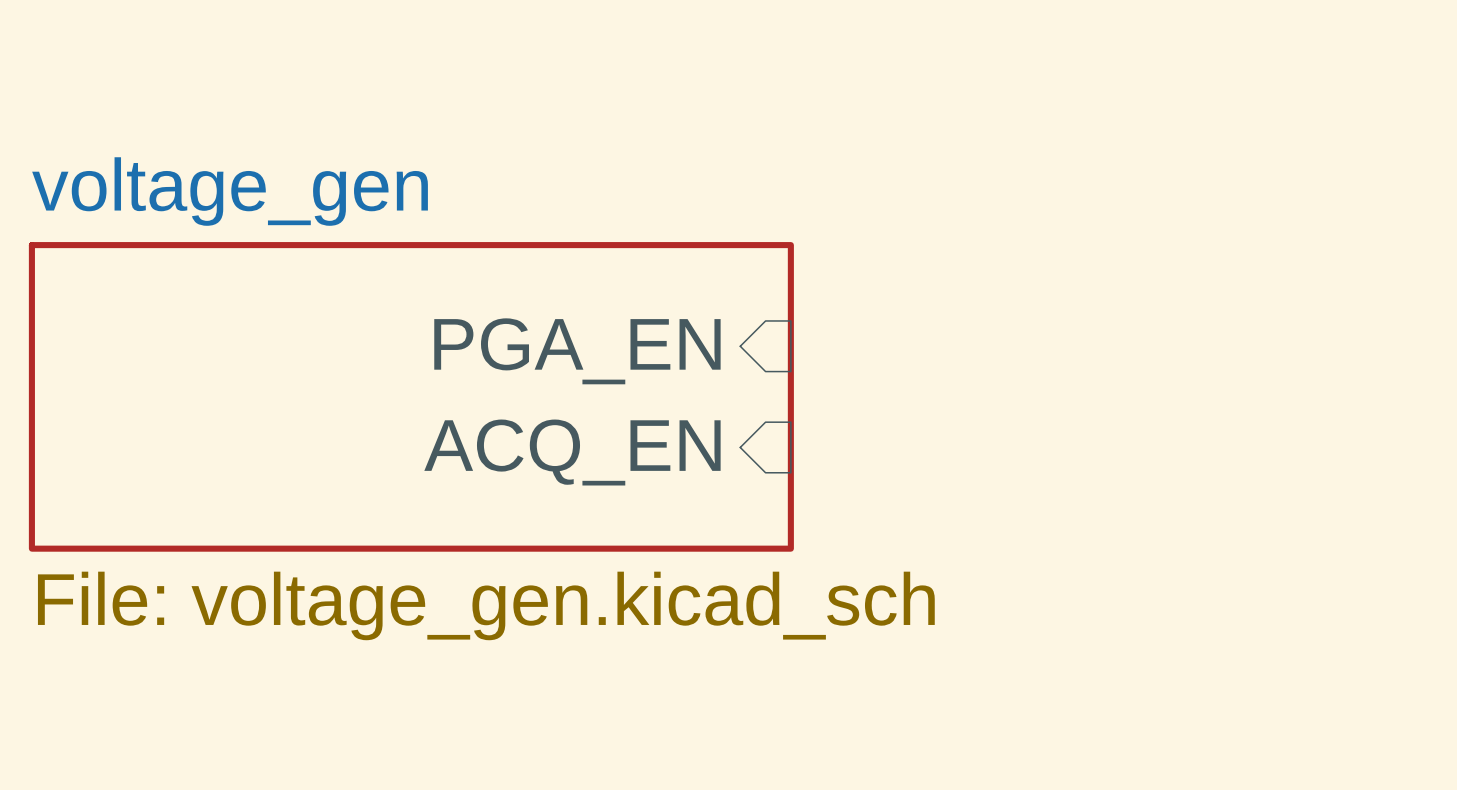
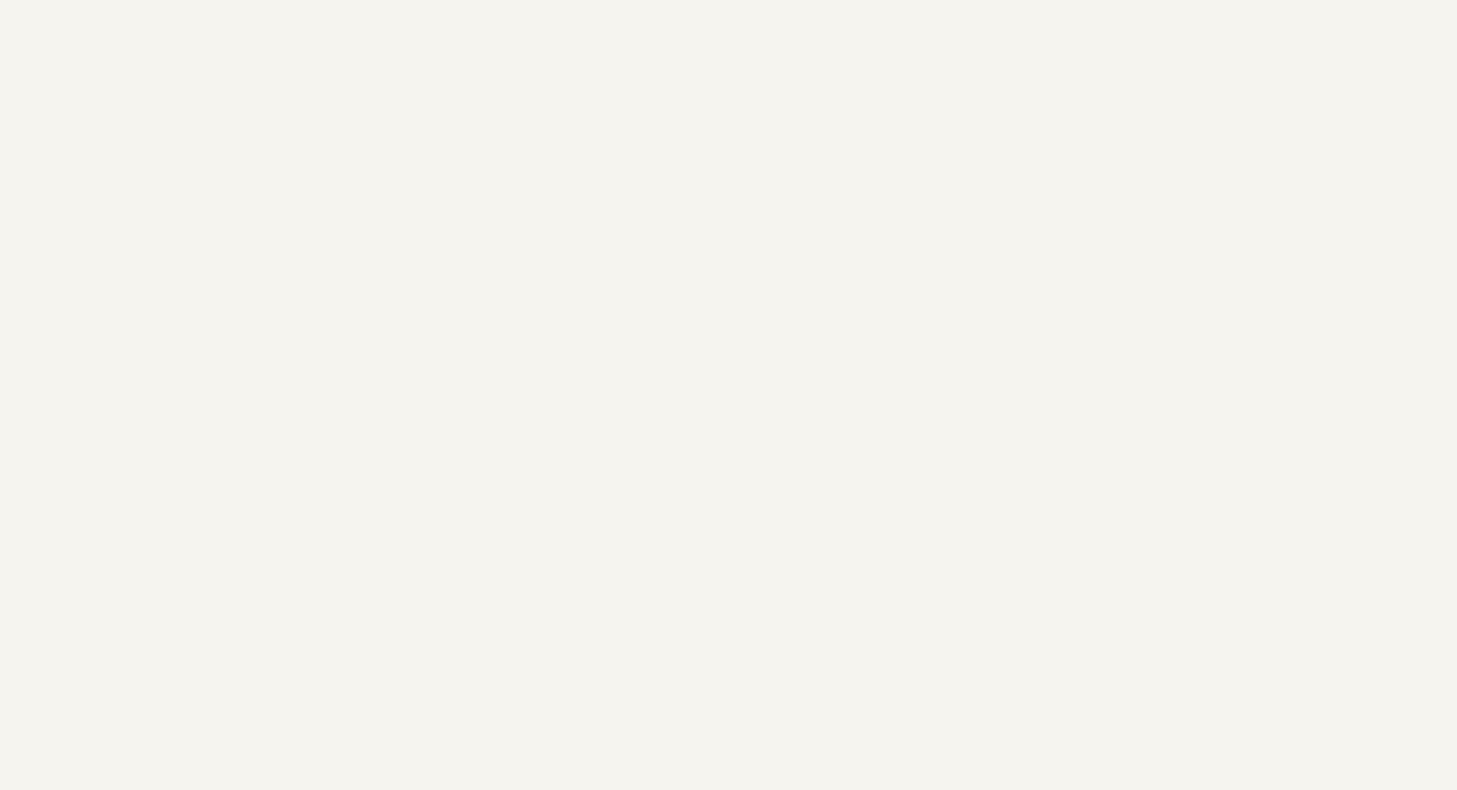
sheet pin: PGA_EN (577, 351) -> none
sheet voltage_gen: File: voltage_gen.kicad_sch (411, 396) -> none
sheet pin: ACQ_EN (572, 452) -> none

